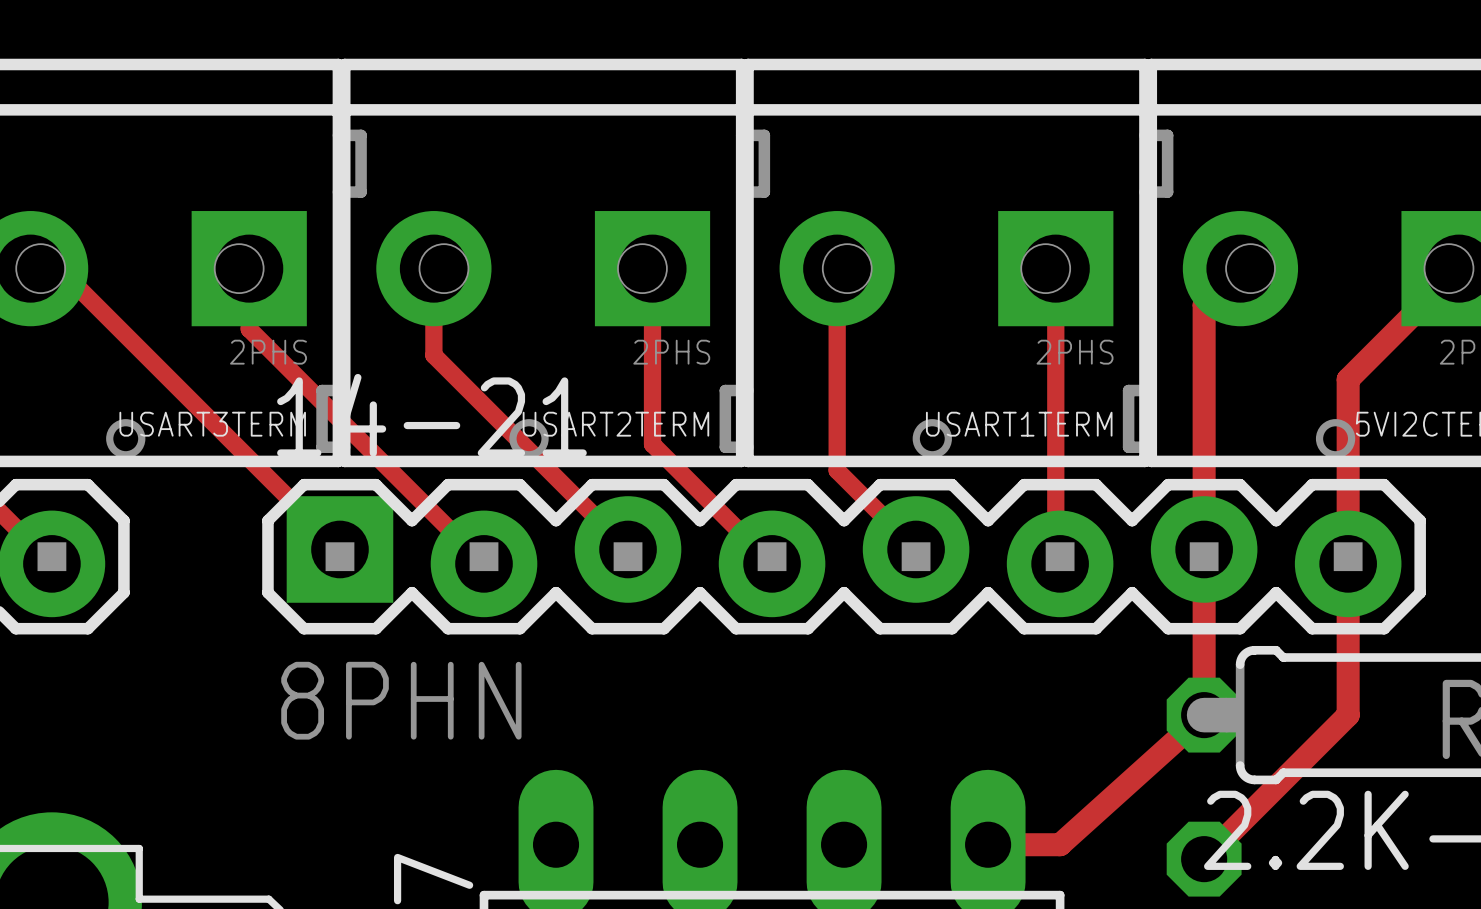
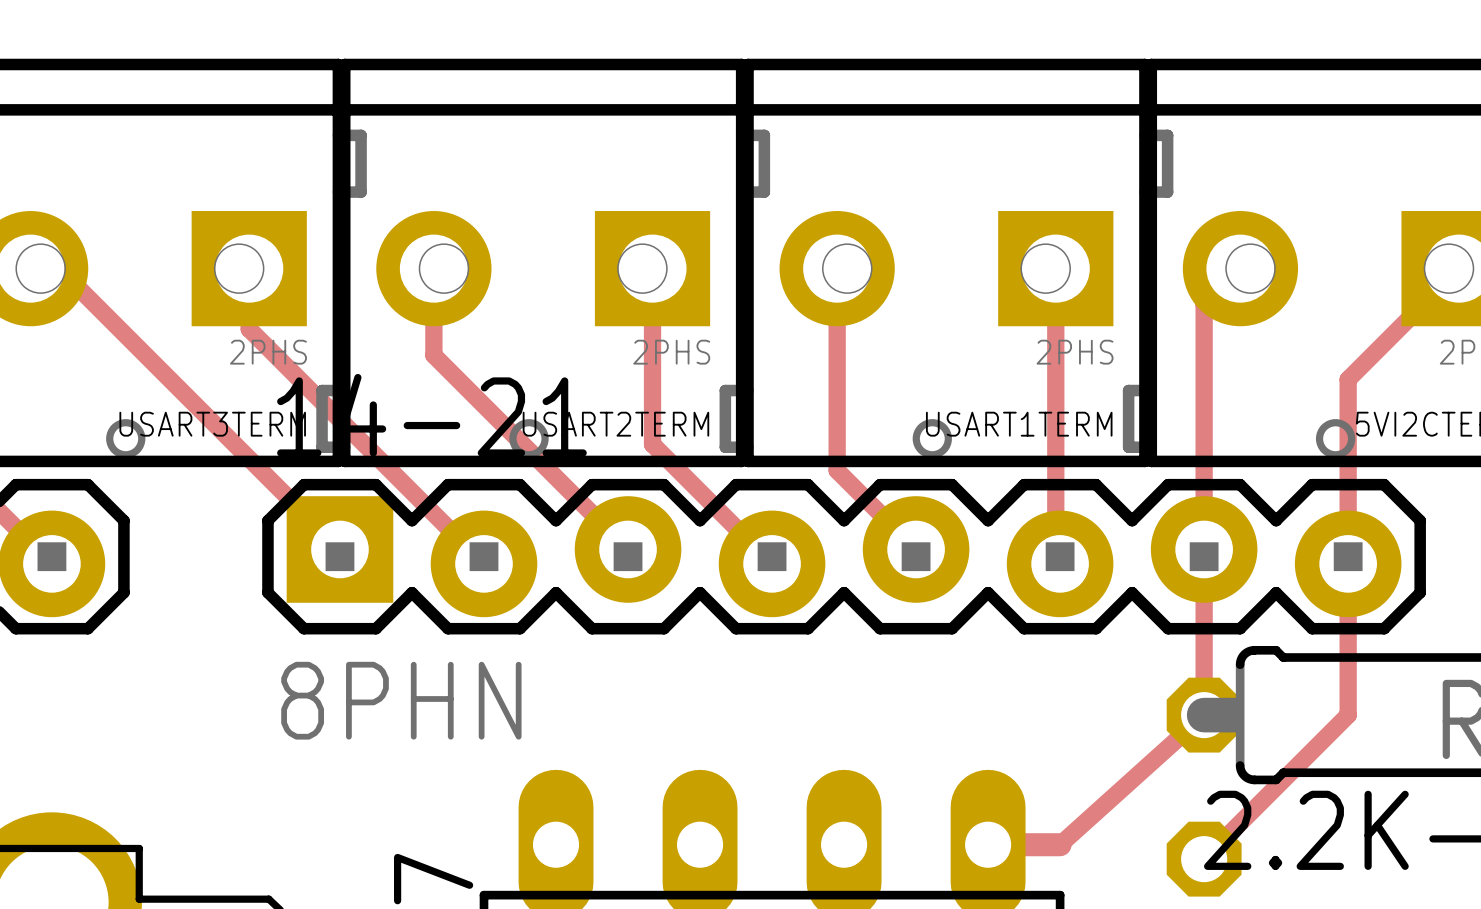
track width: thick (1240, 268) (1204, 304) (1204, 549) -> thin (1240, 268) (1204, 304) (1204, 549)
track width: thick (1459, 268) (1348, 379) (1348, 715) (1204, 859) -> thin (1459, 268) (1348, 379) (1348, 715) (1204, 859)
track width: thick (1204, 556) (1204, 715) (1060, 844) -> thin (1204, 556) (1204, 715) (1060, 844)

